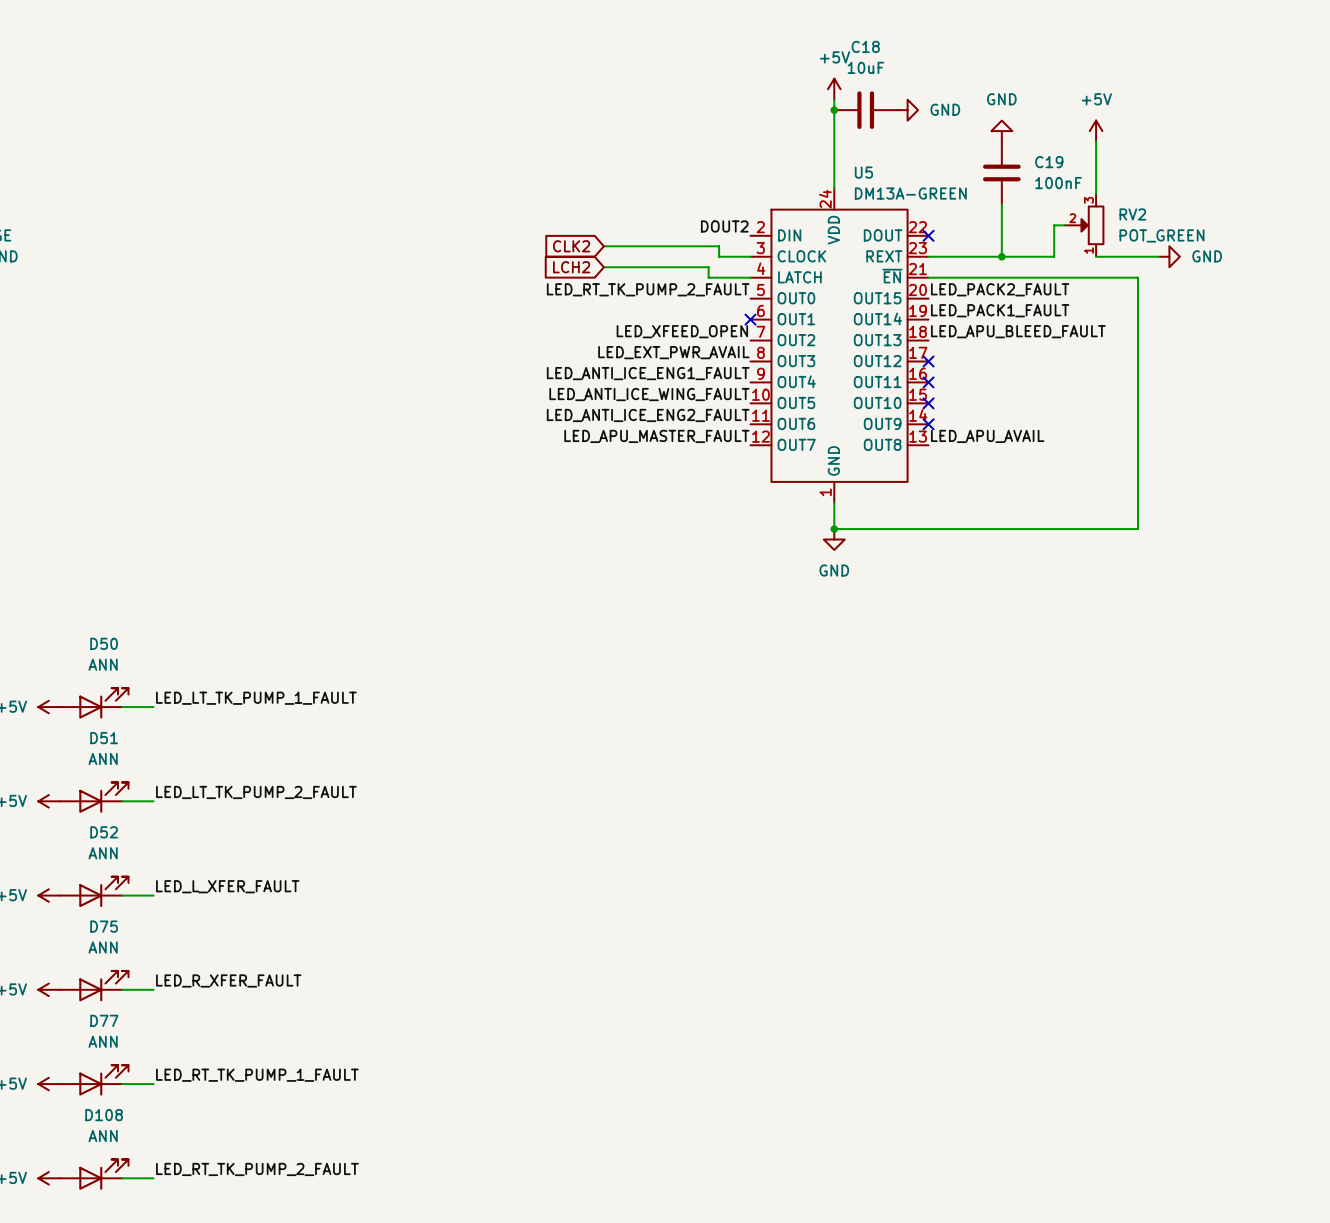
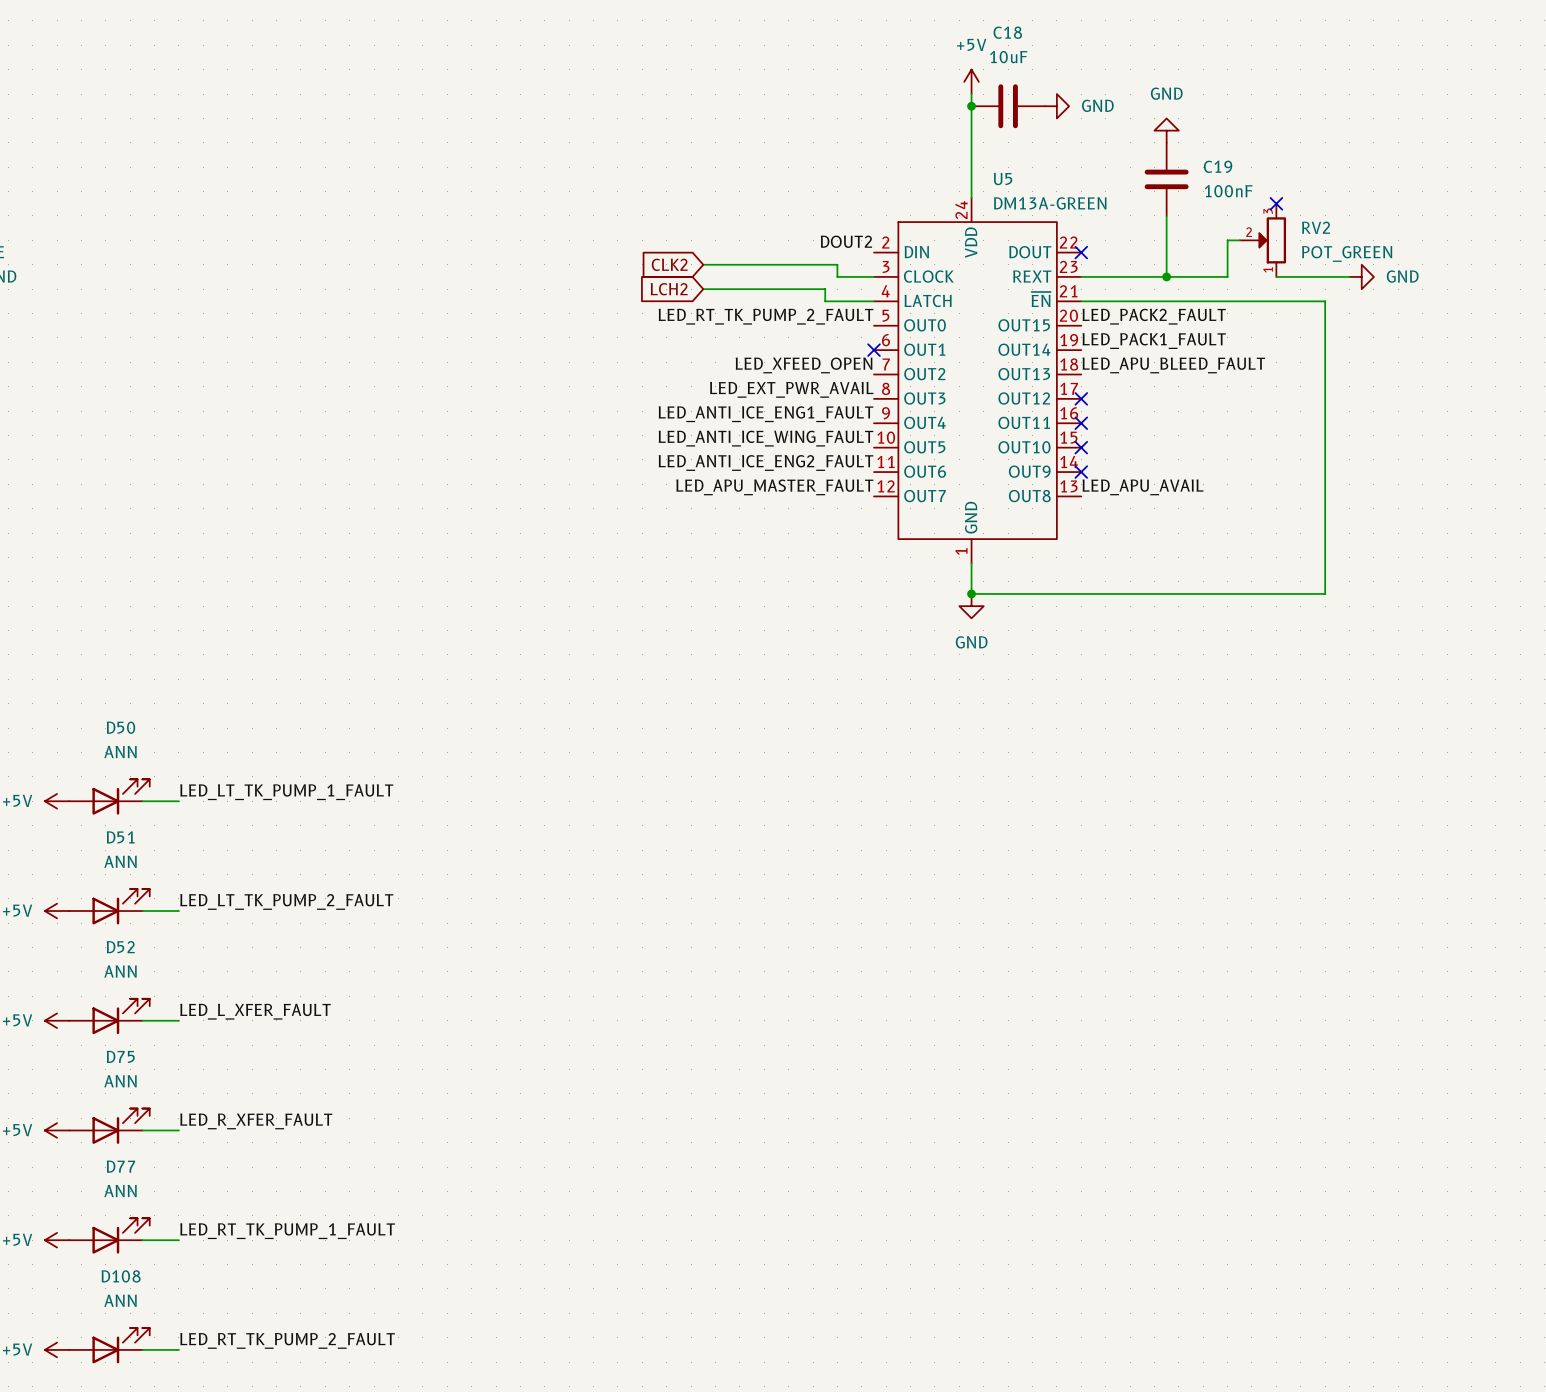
power symbol: +5V (1096, 131) -> none
wire: (1096, 141) (1096, 193) -> none
no-connect mark: none -> (1276, 203)

